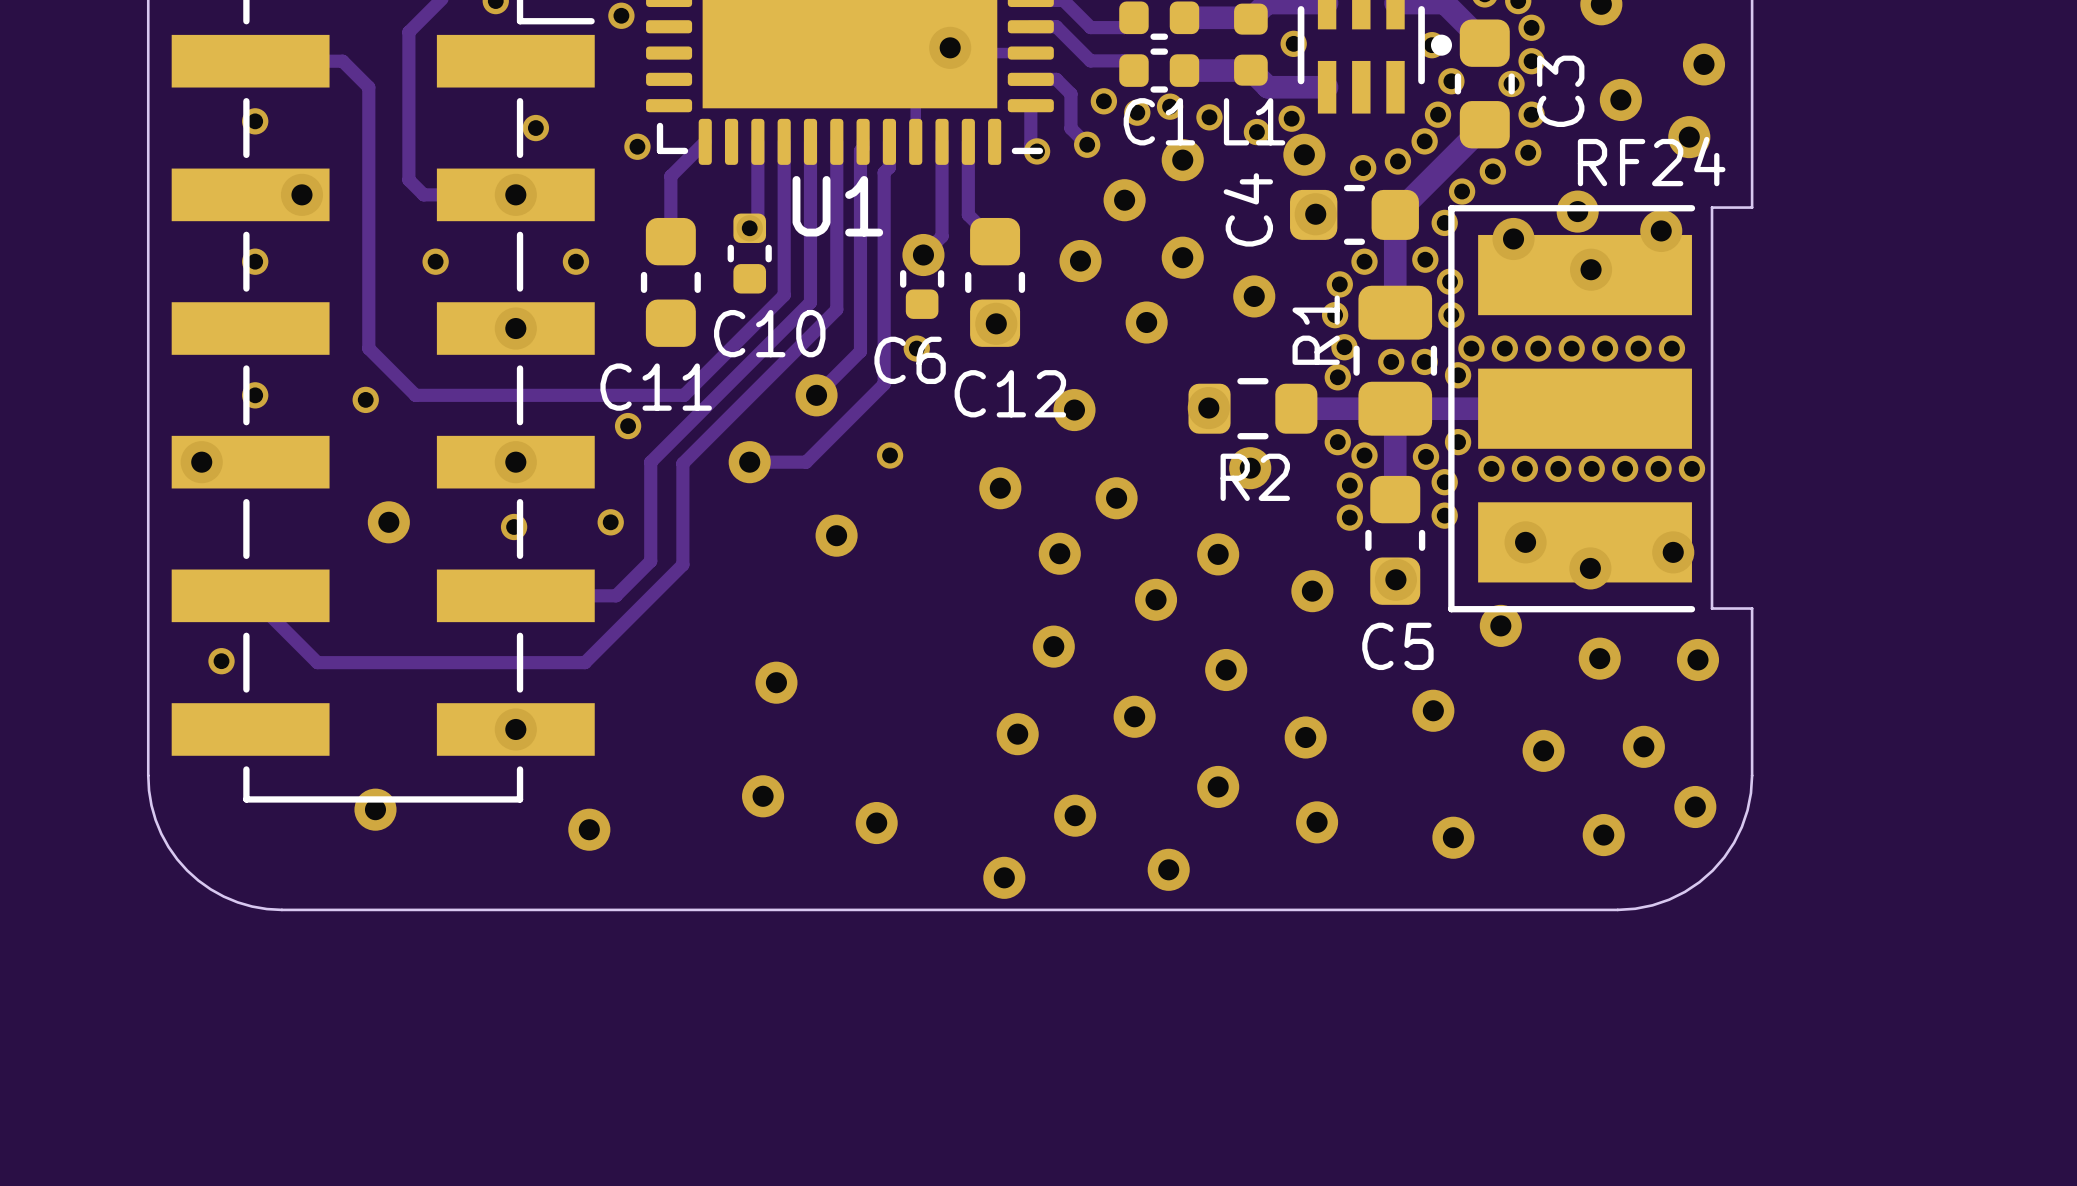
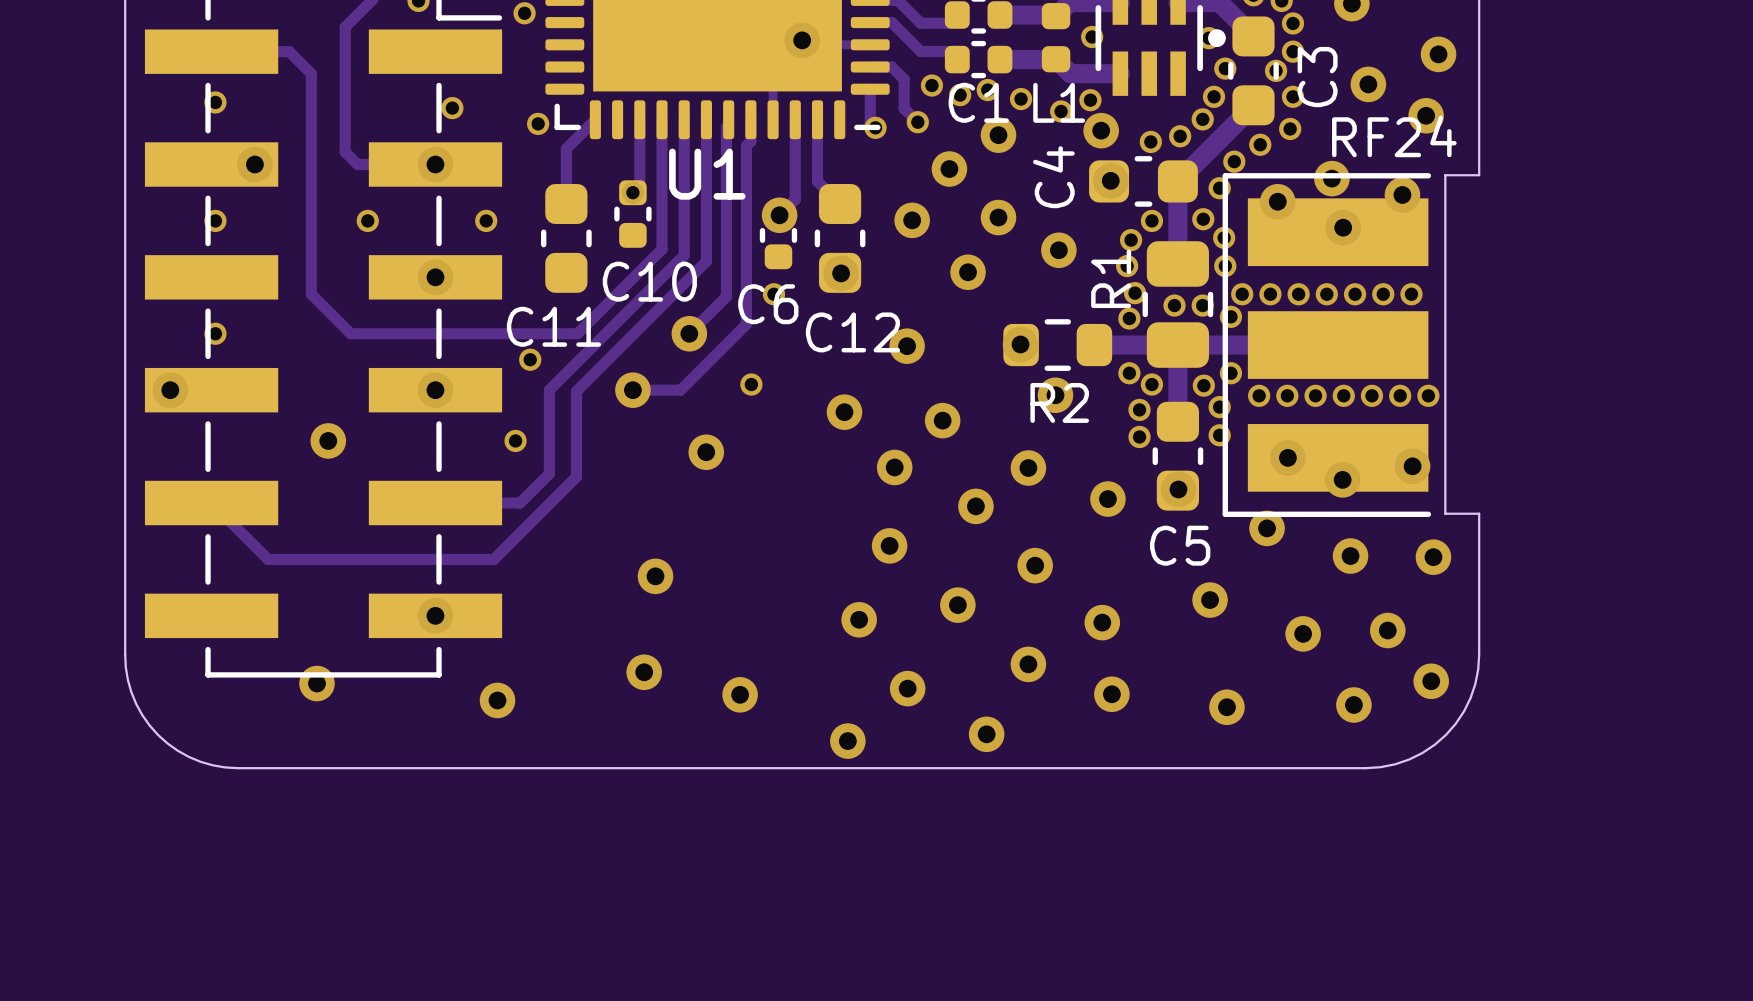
via: (365, 399) -> none
via: (514, 526) -> none
via: (221, 661) -> none

